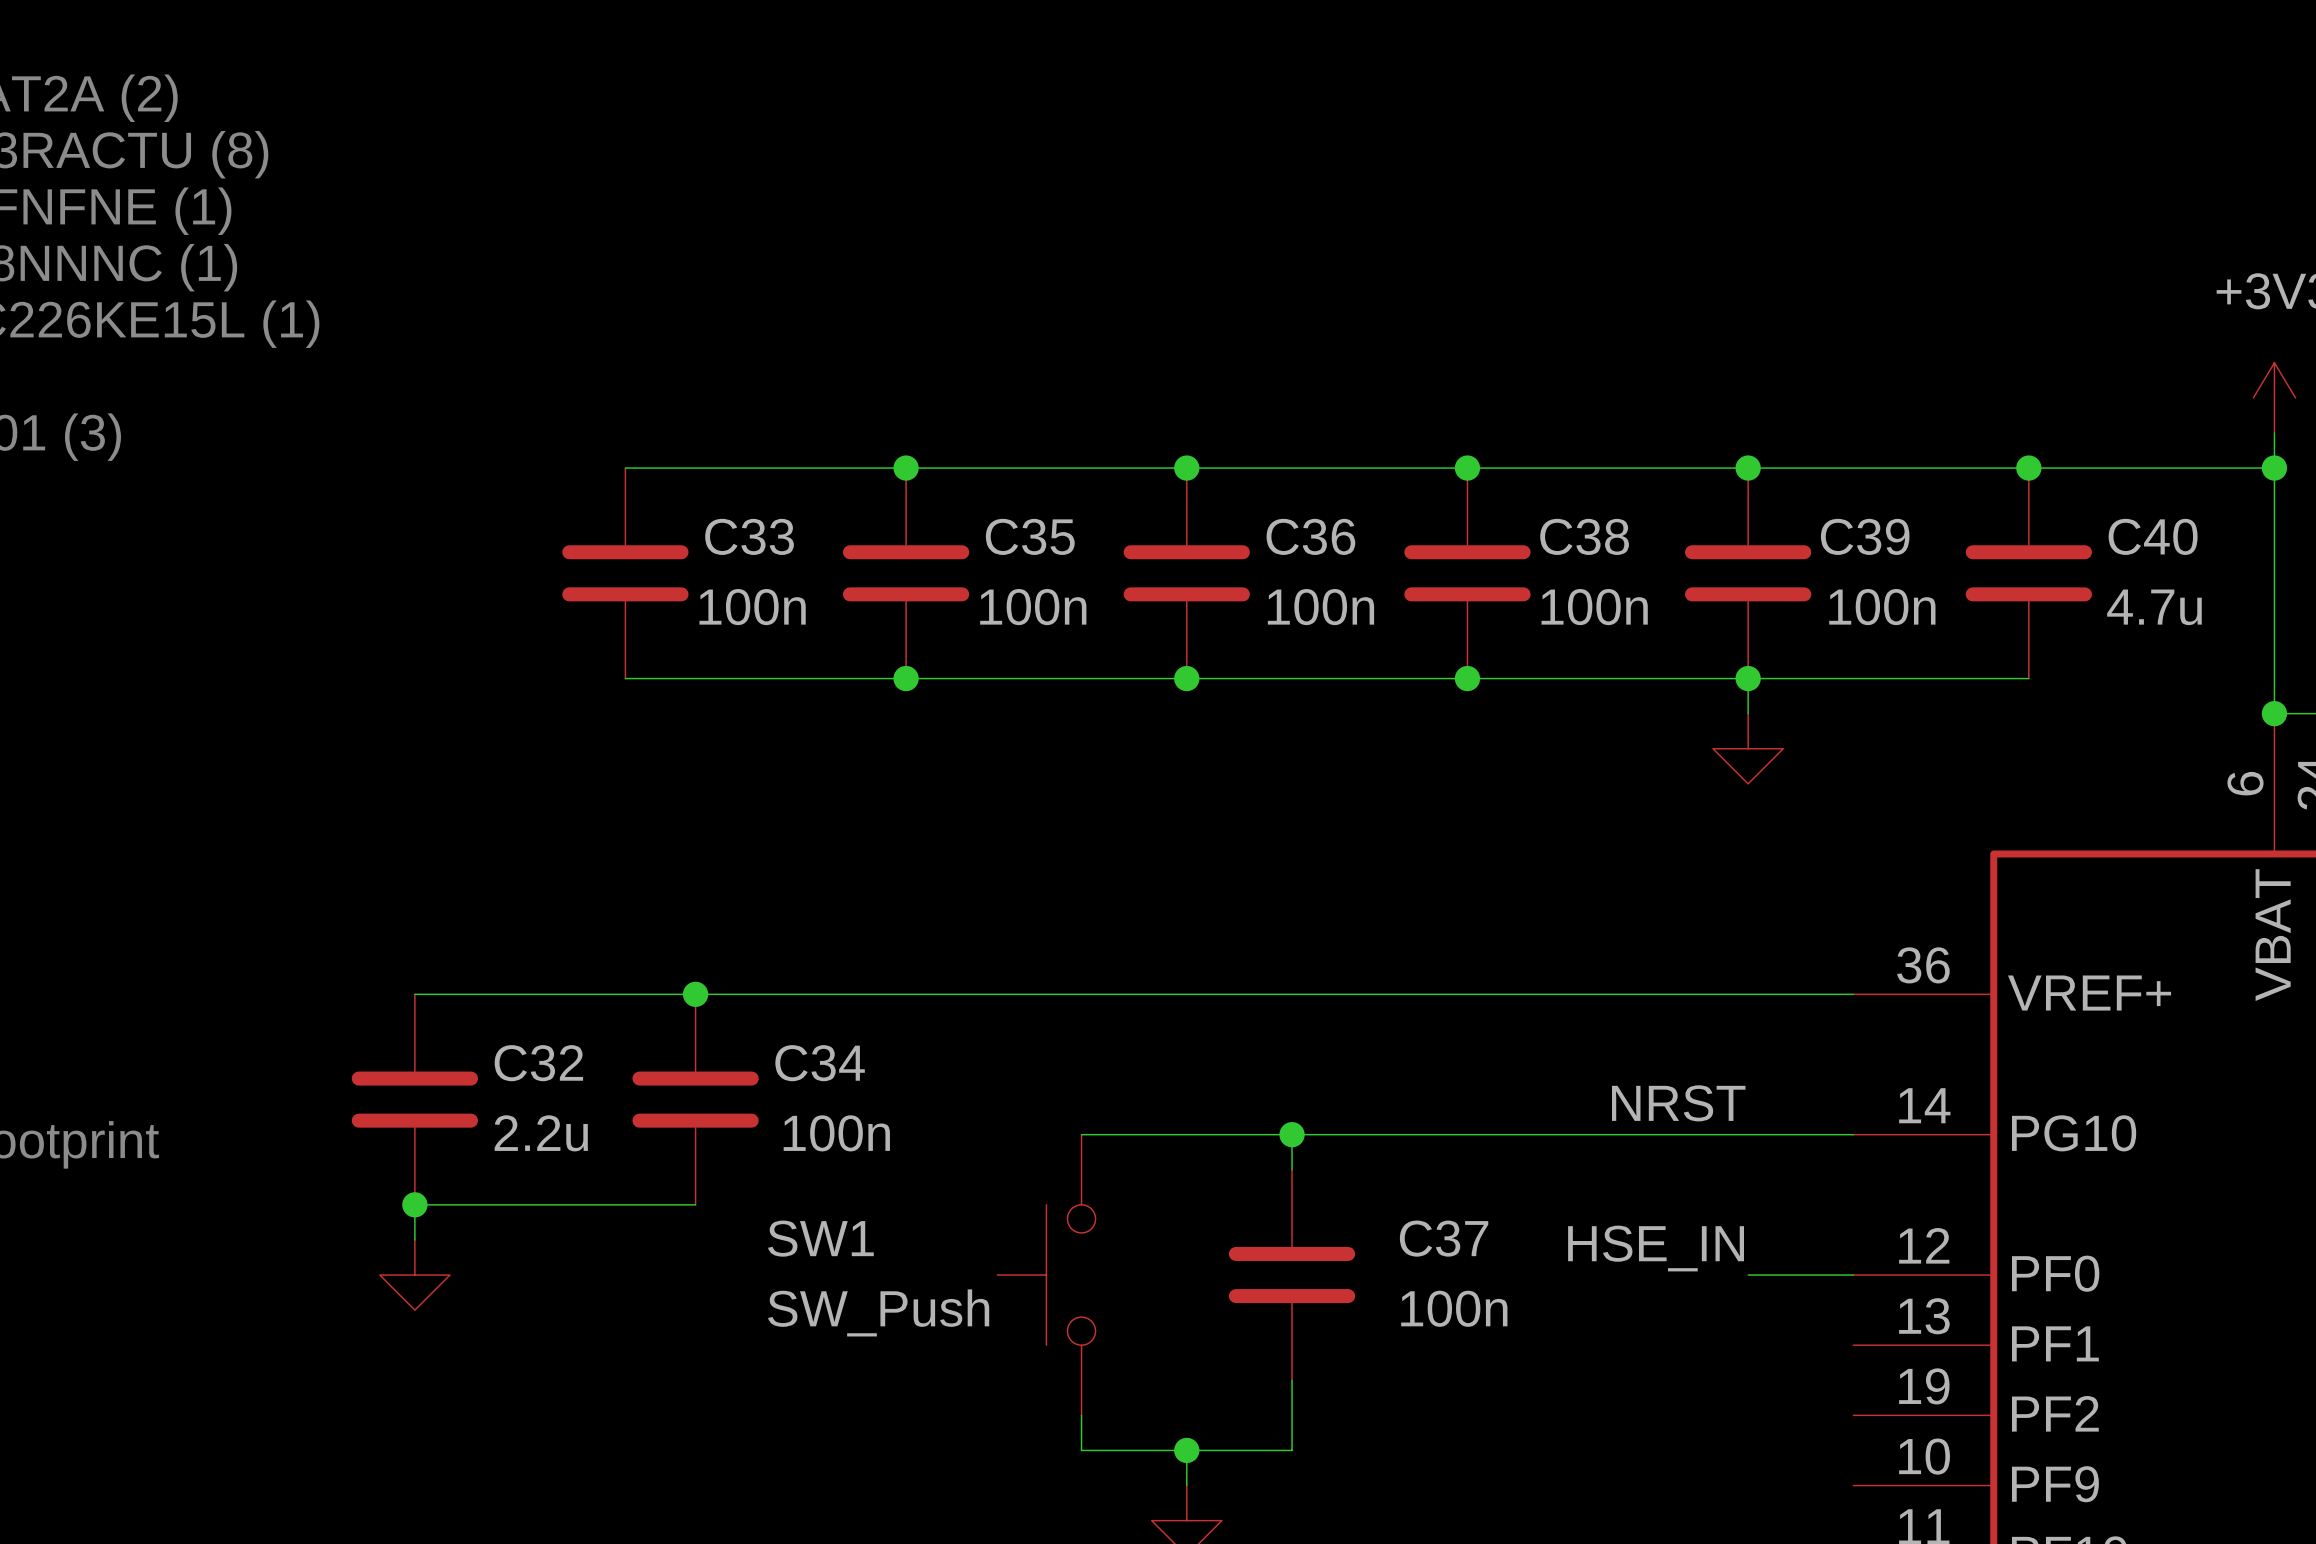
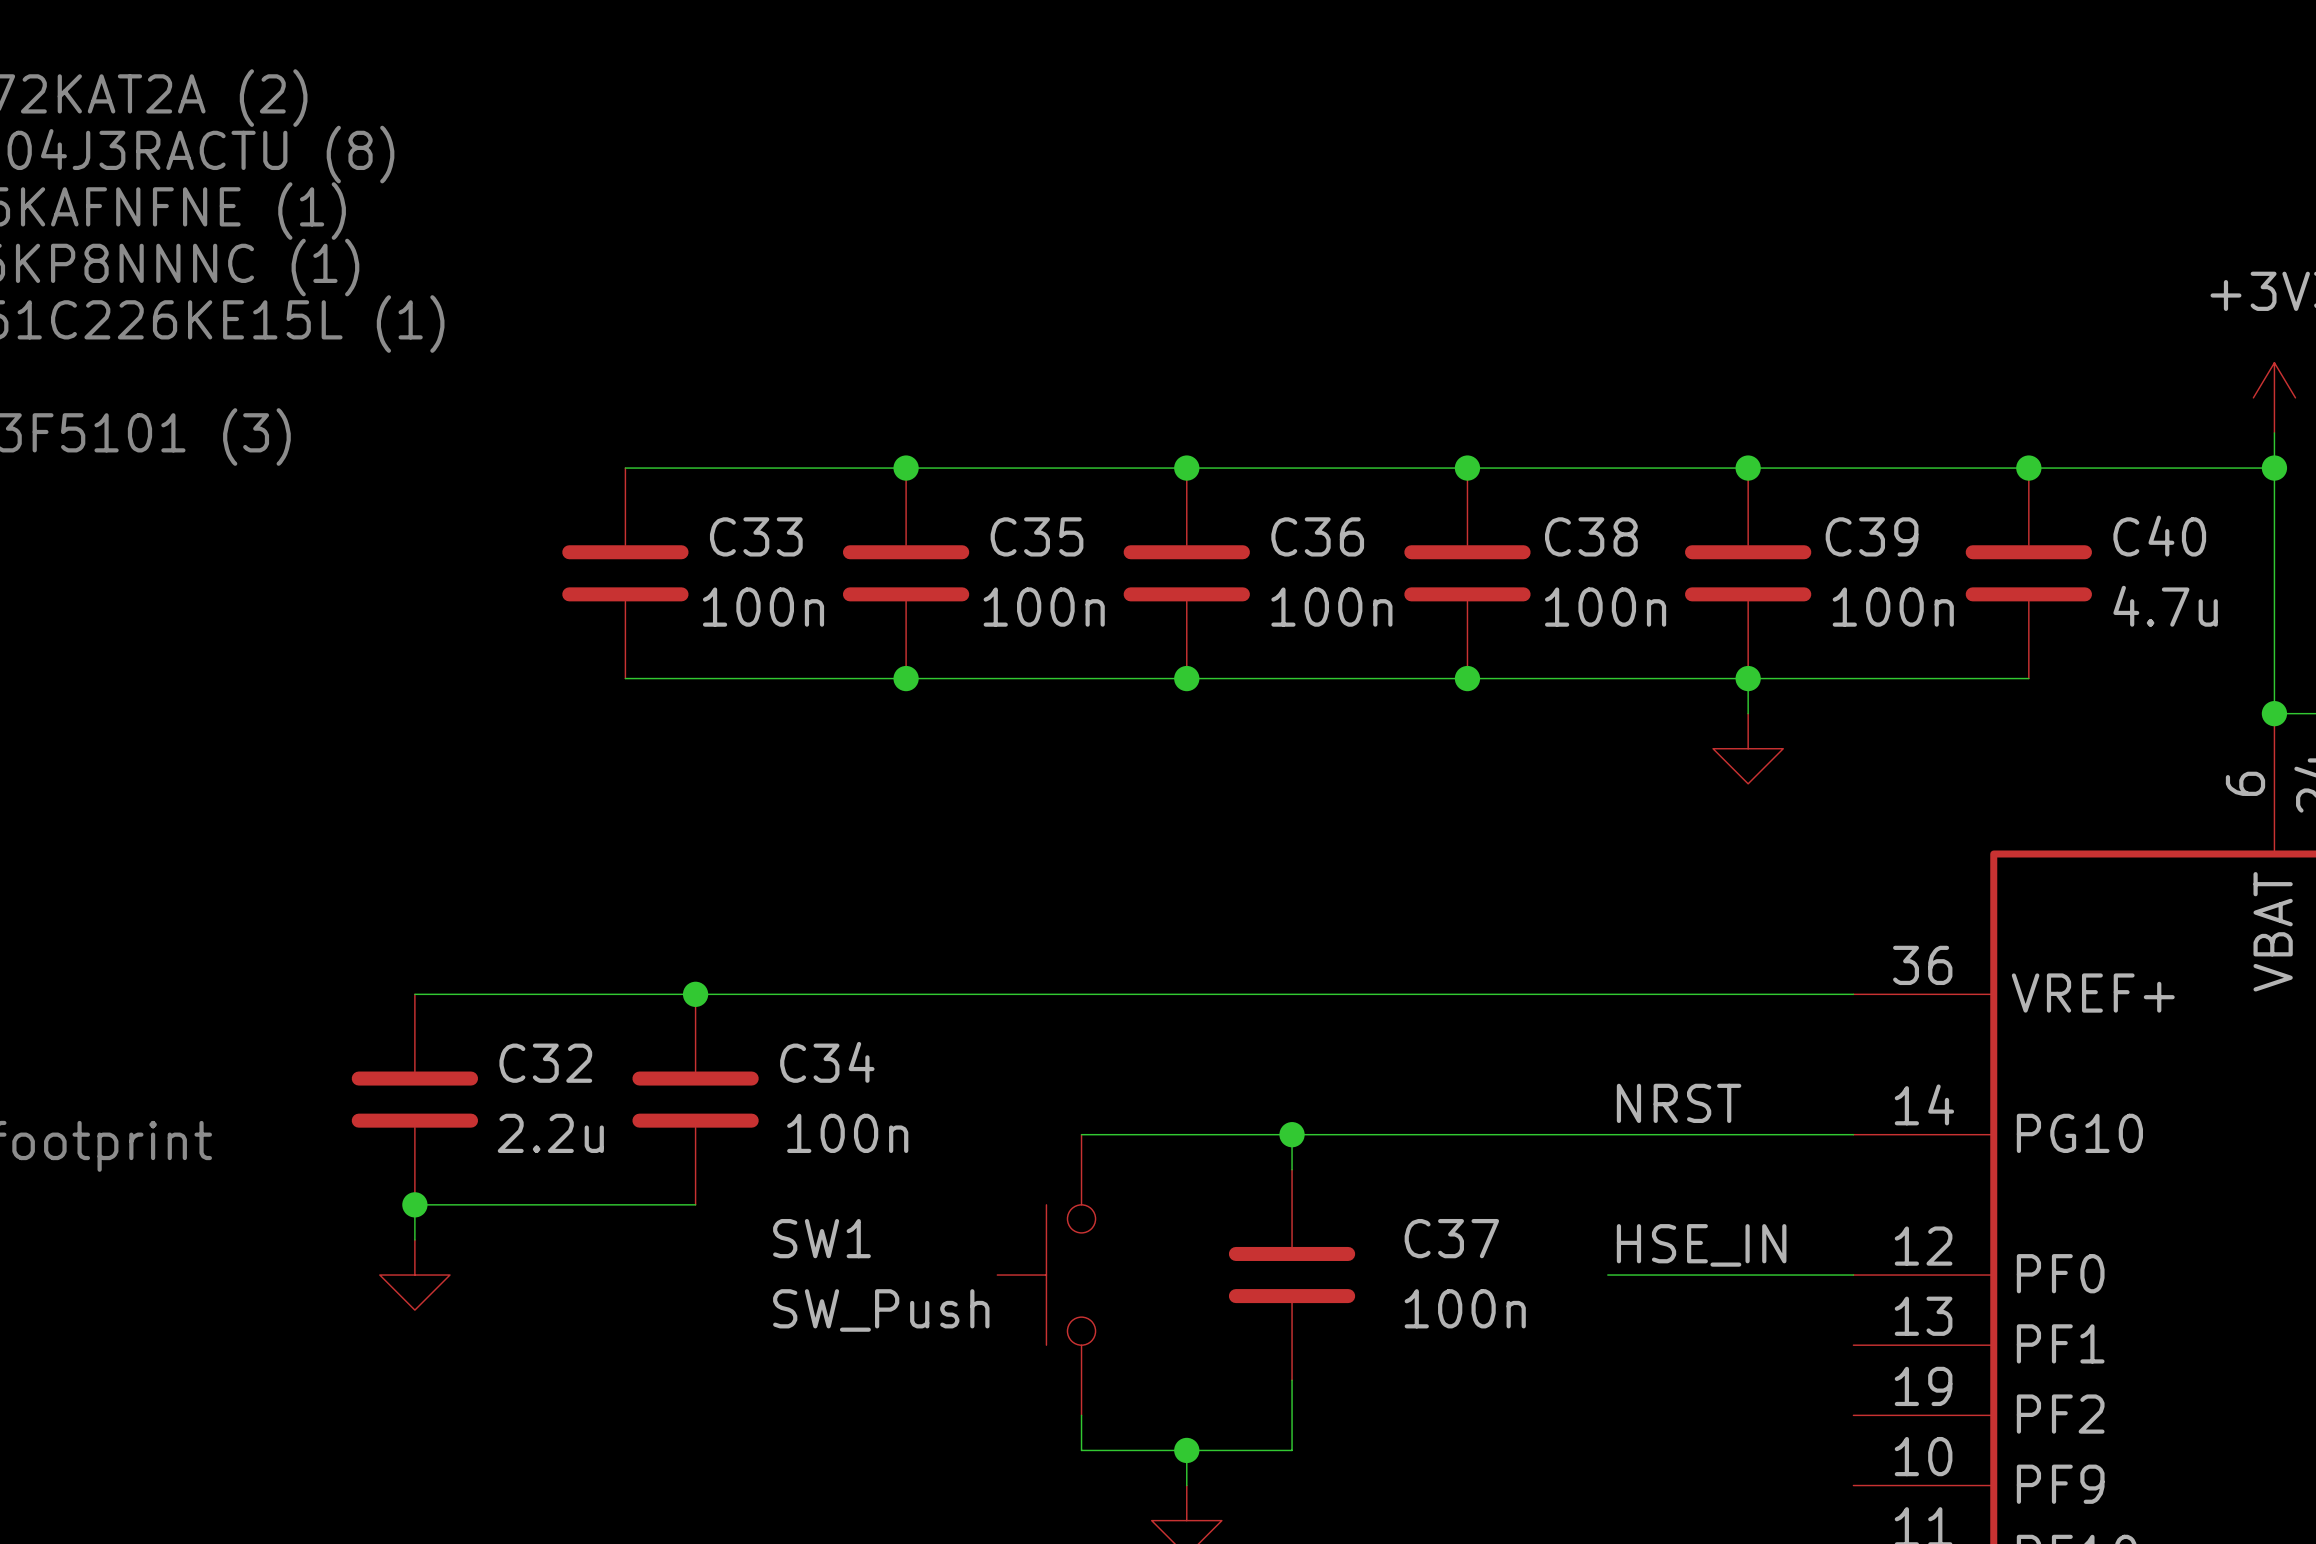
label position: HSE_IN (1656, 1248) -> HSE_IN (1701, 1245)
wire: none -> (1607, 1275) (1748, 1275)

